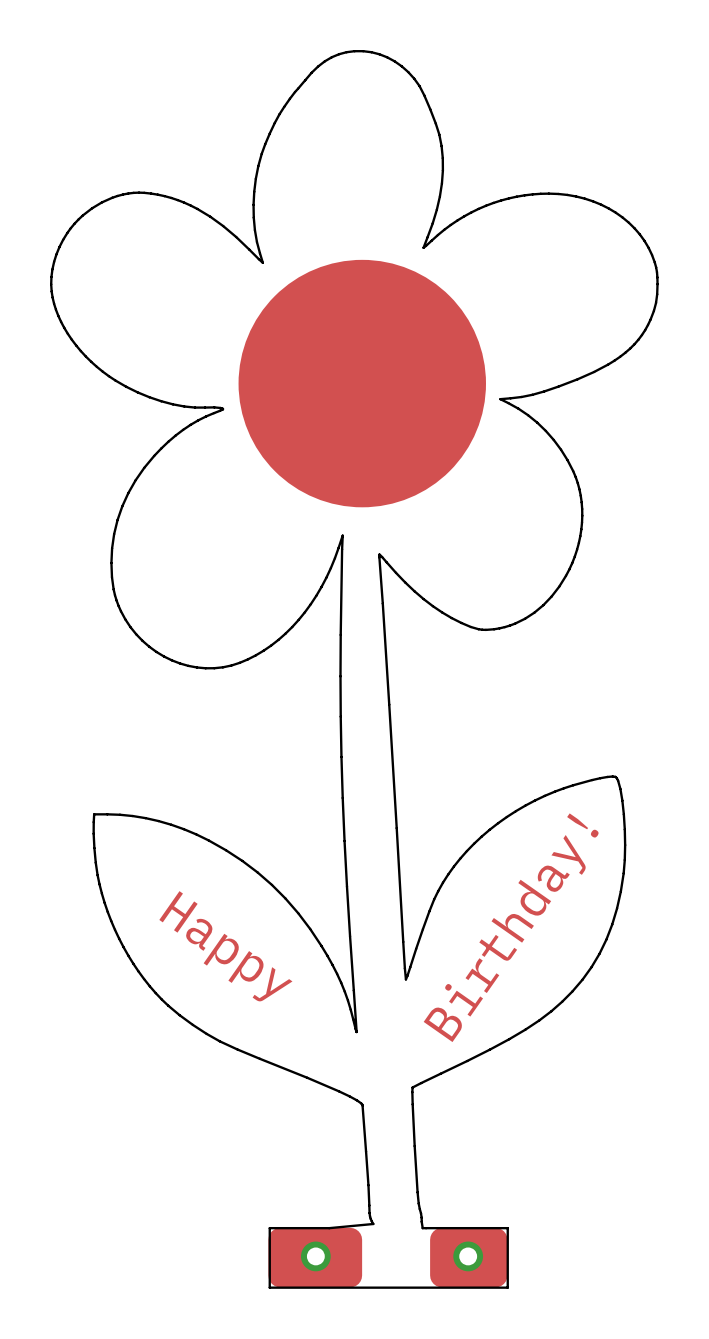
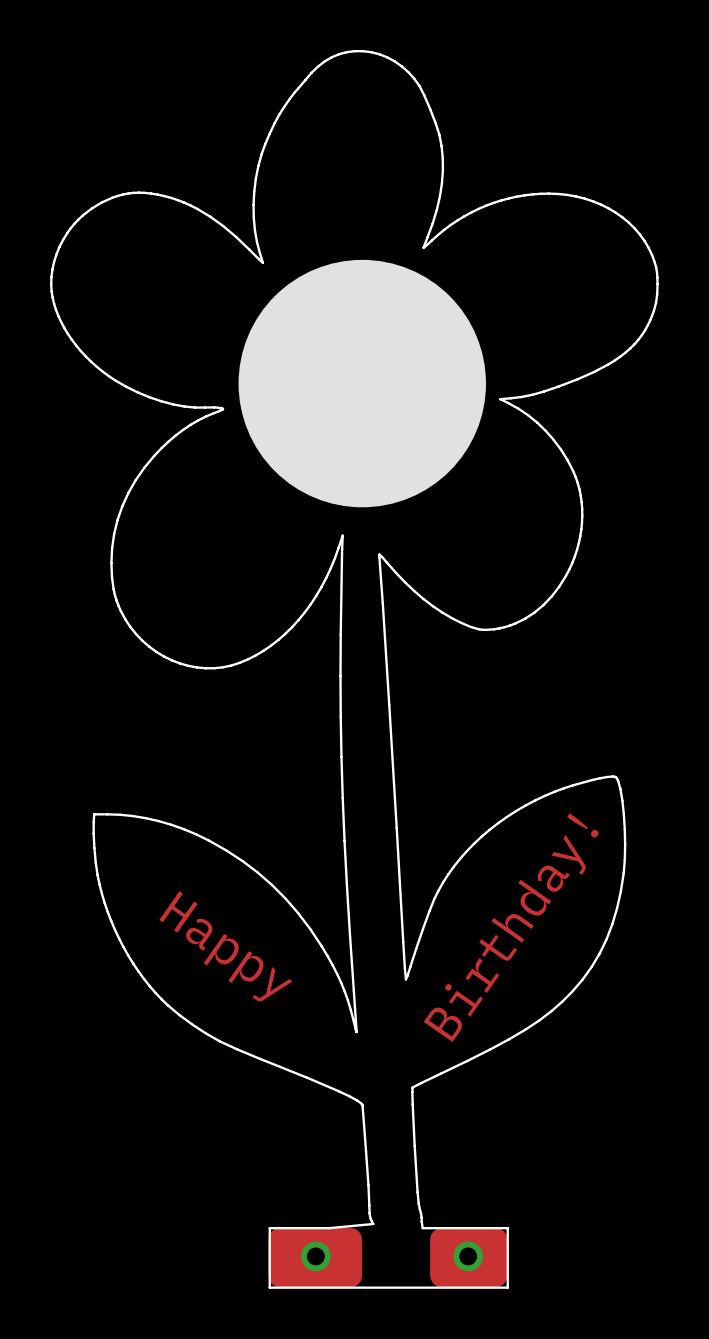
drawing shape: [238, 259, 486, 508] -> [238, 259, 486, 508]

